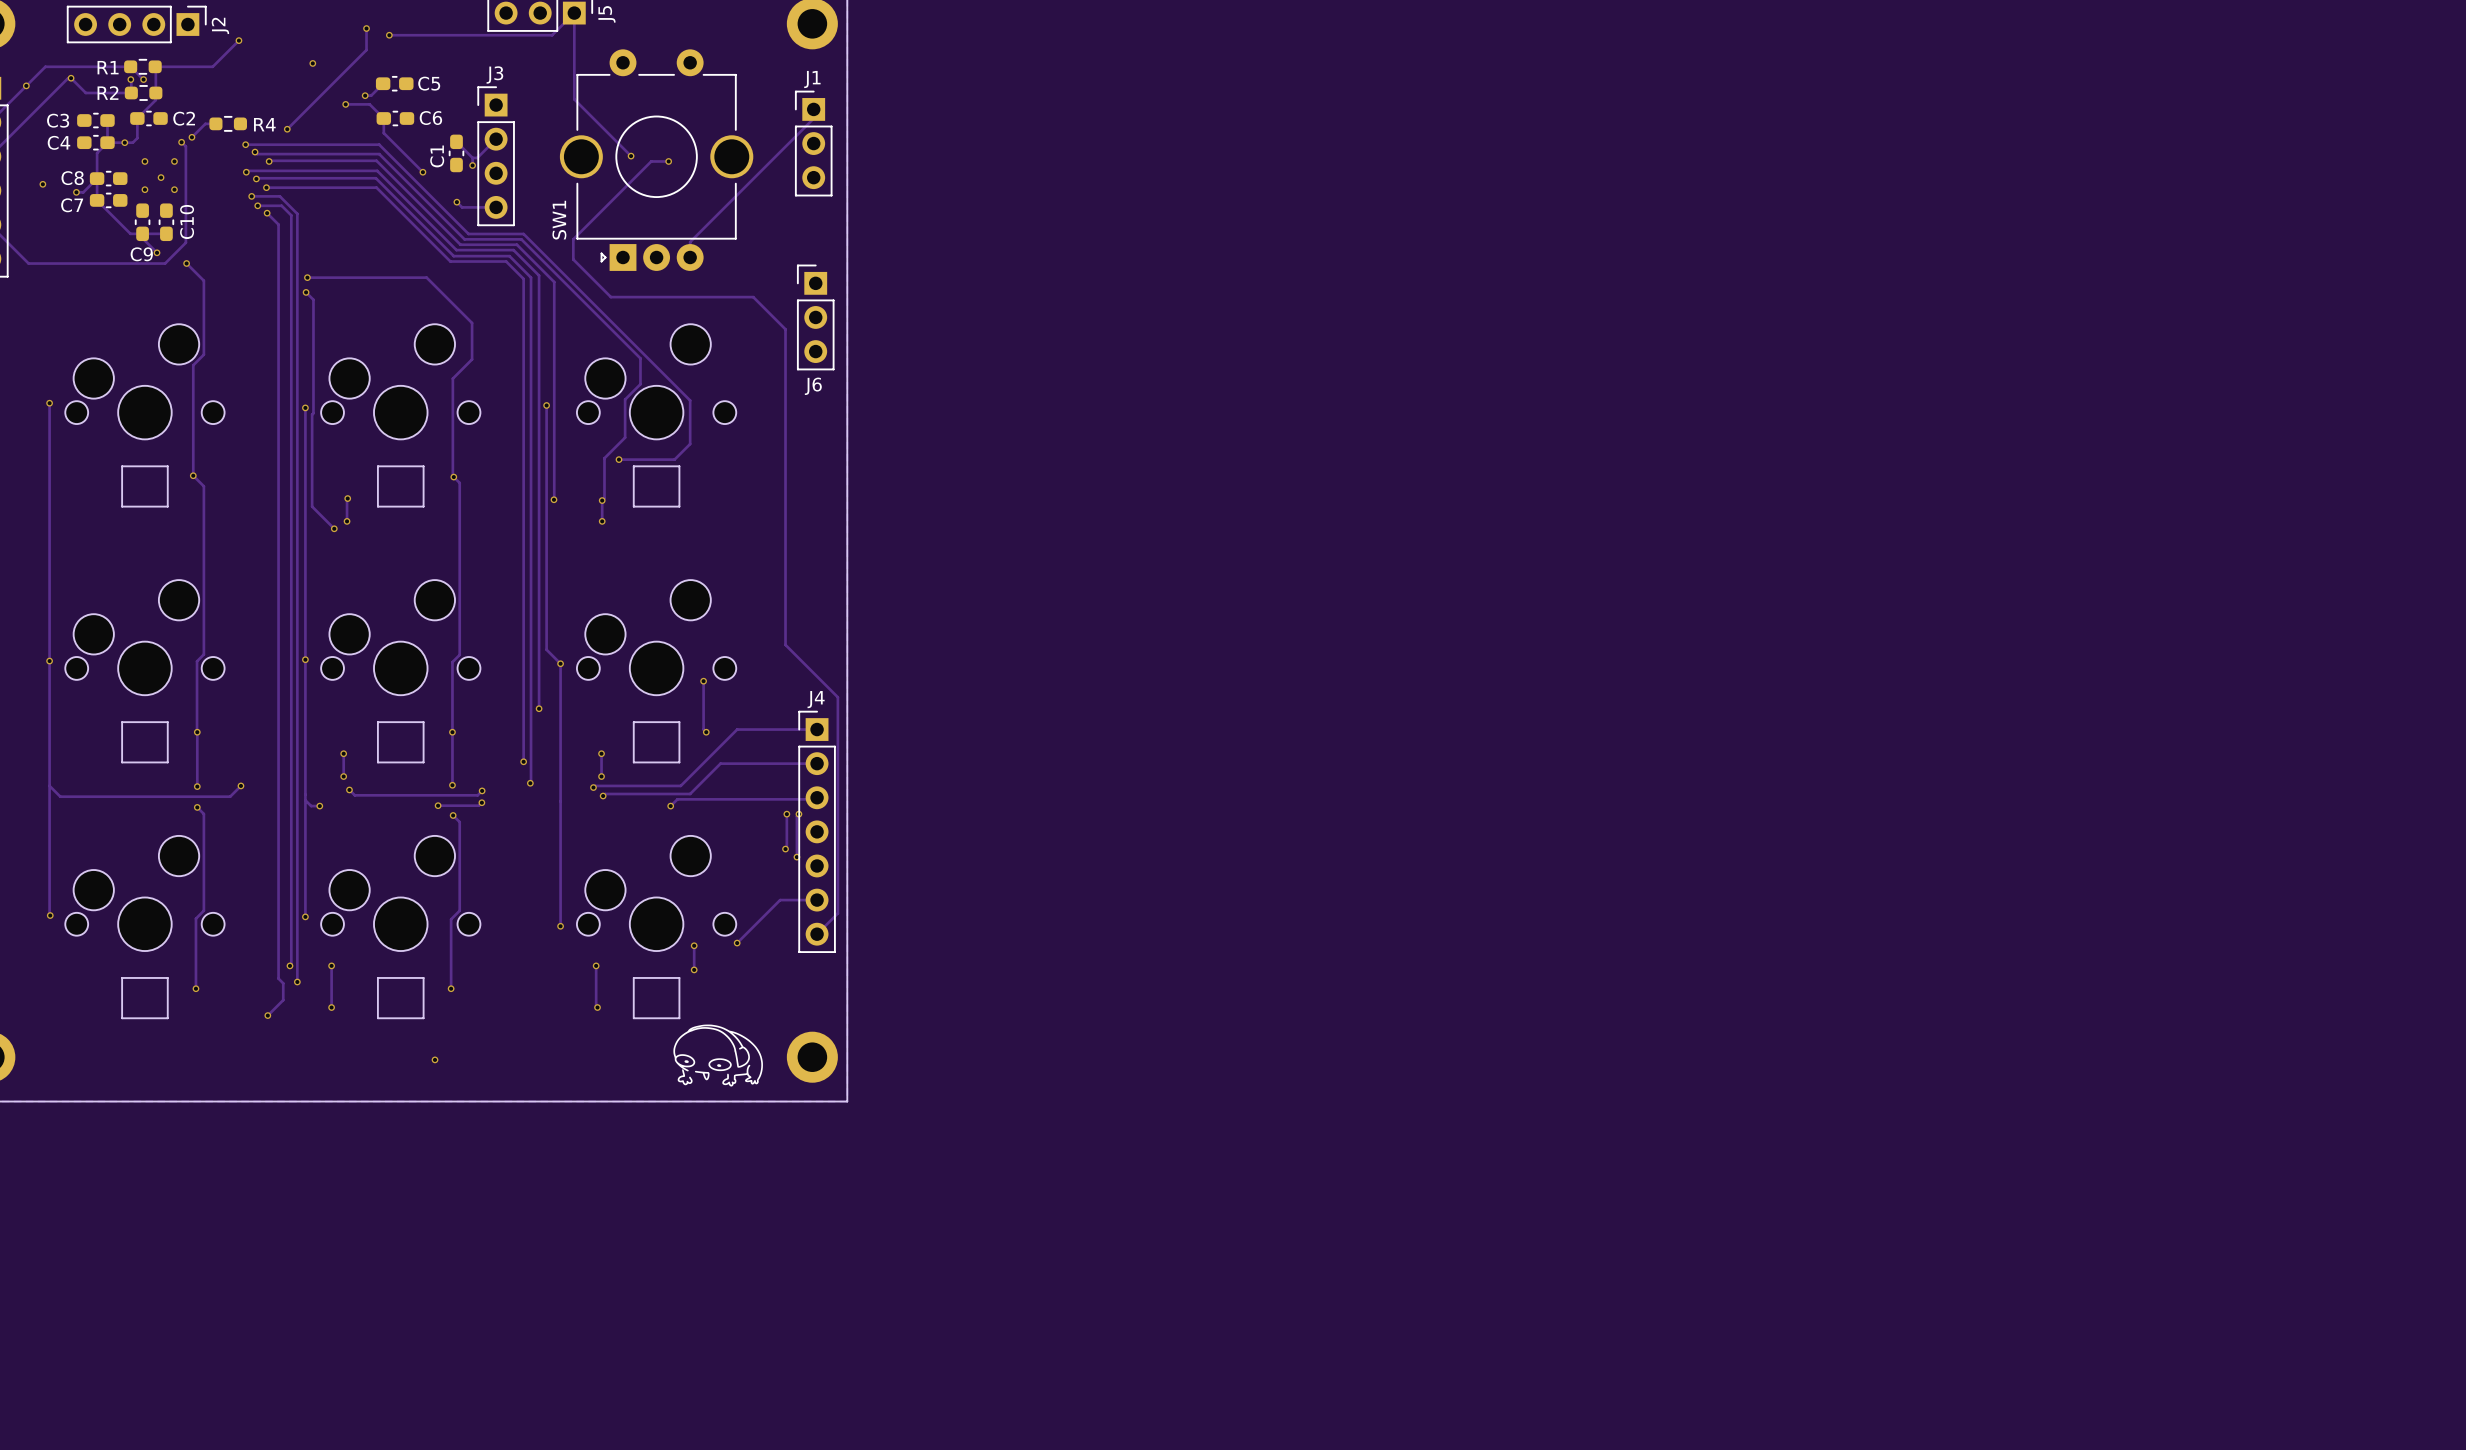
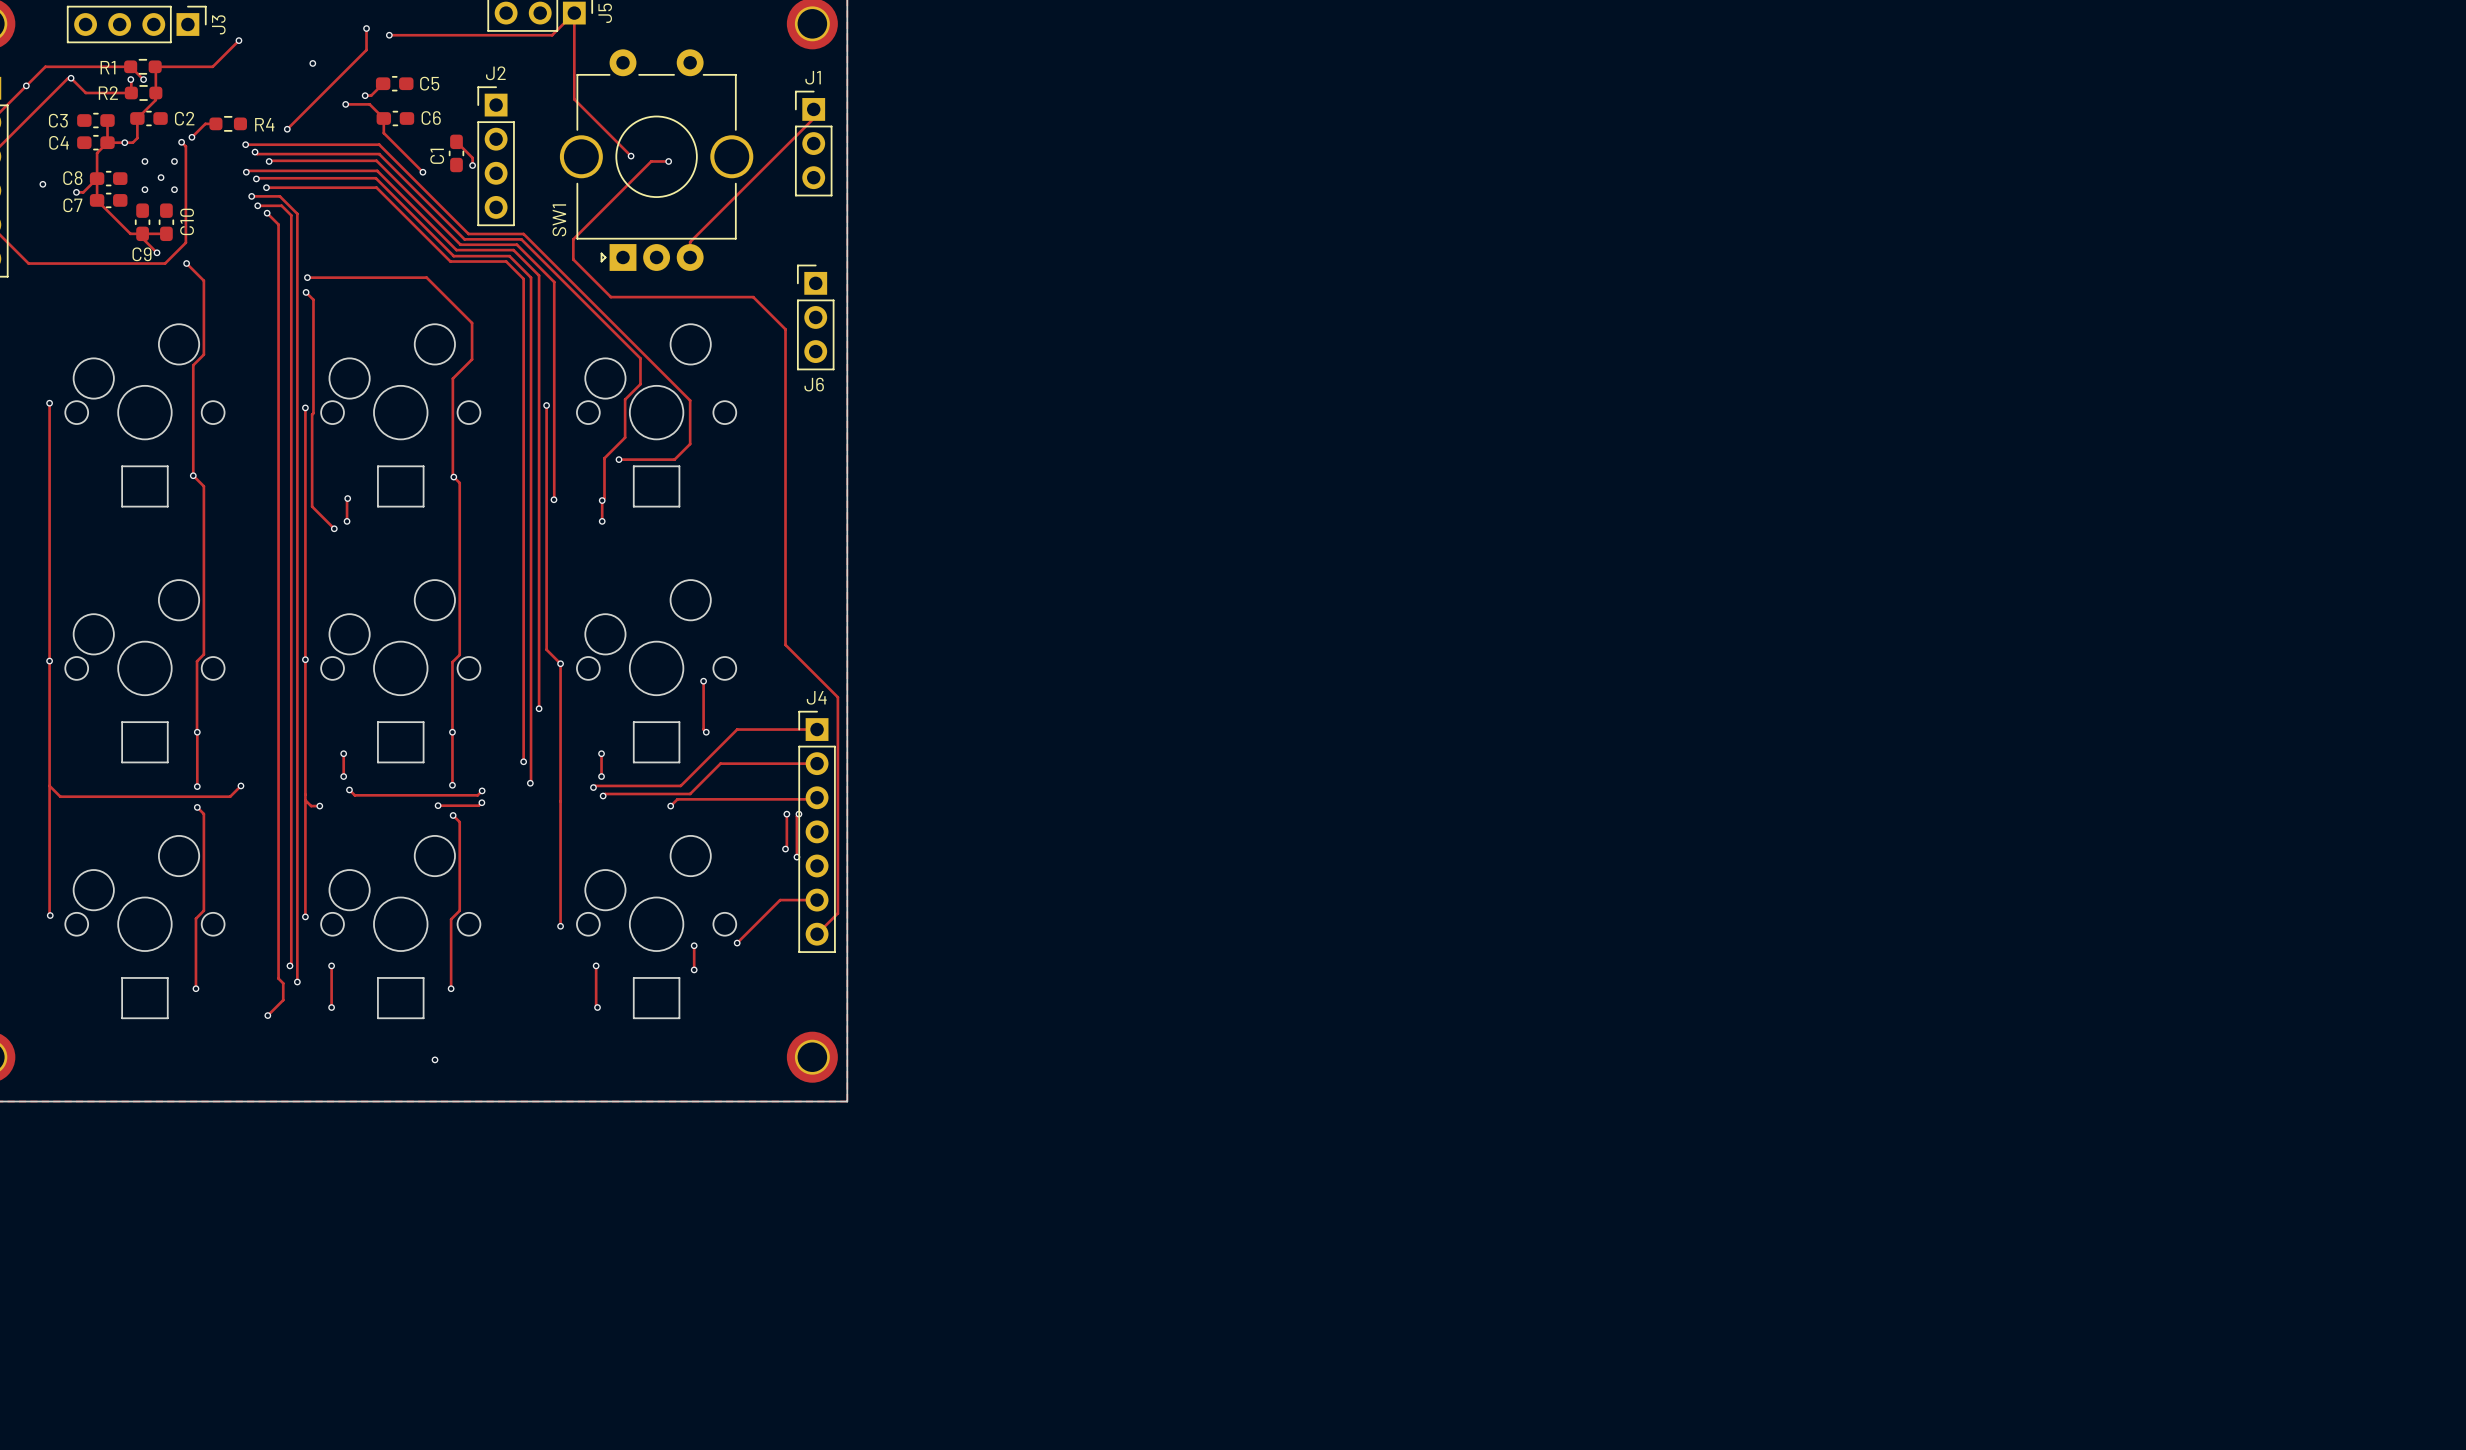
J2 name: J2 (220, 25) -> J3 (218, 24)
J3 name: J3 (494, 75) -> J2 (495, 73)
track: (496, 139) (477, 157) (472, 157) -> none
track: (456, 202) (462, 207) (496, 207) -> none
via: (456, 202) -> none
drawing: [673, 1024, 763, 1087] -> none

